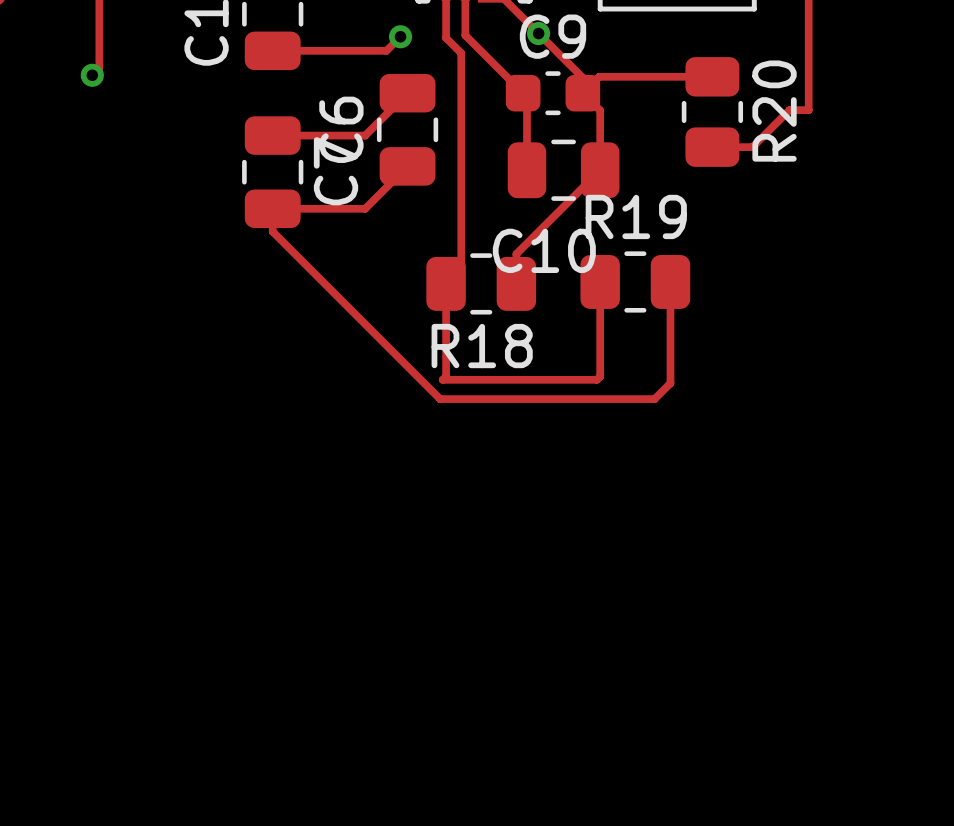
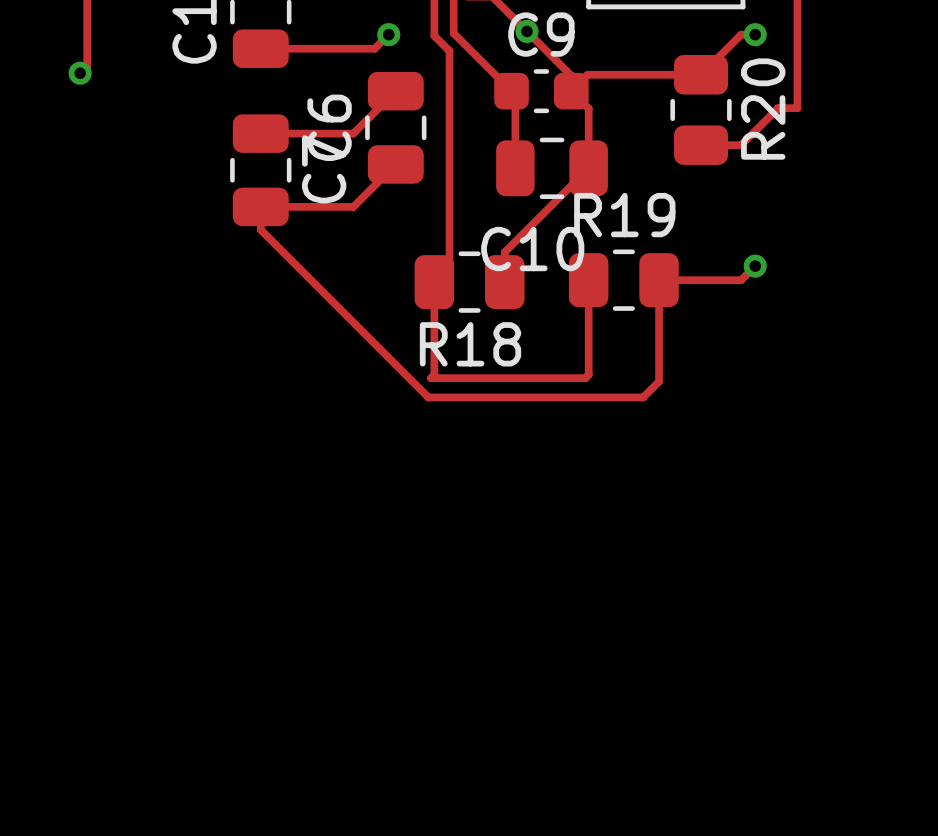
track: none -> (755, 34) (741, 34) (701, 74)
via: none -> (755, 34)
track: none -> (755, 266) (741, 280) (659, 280)
via: none -> (755, 266)

